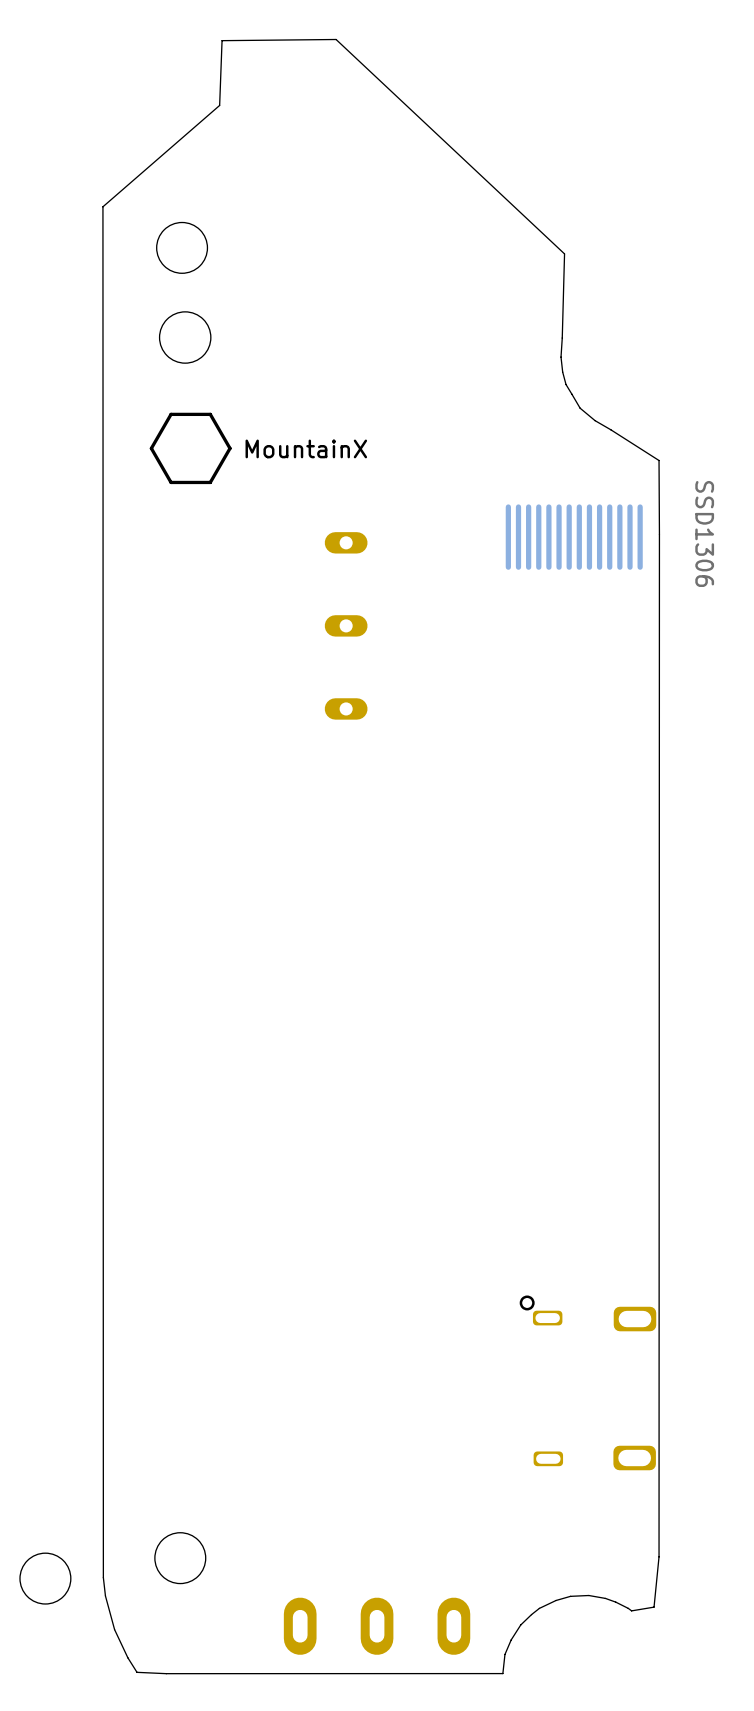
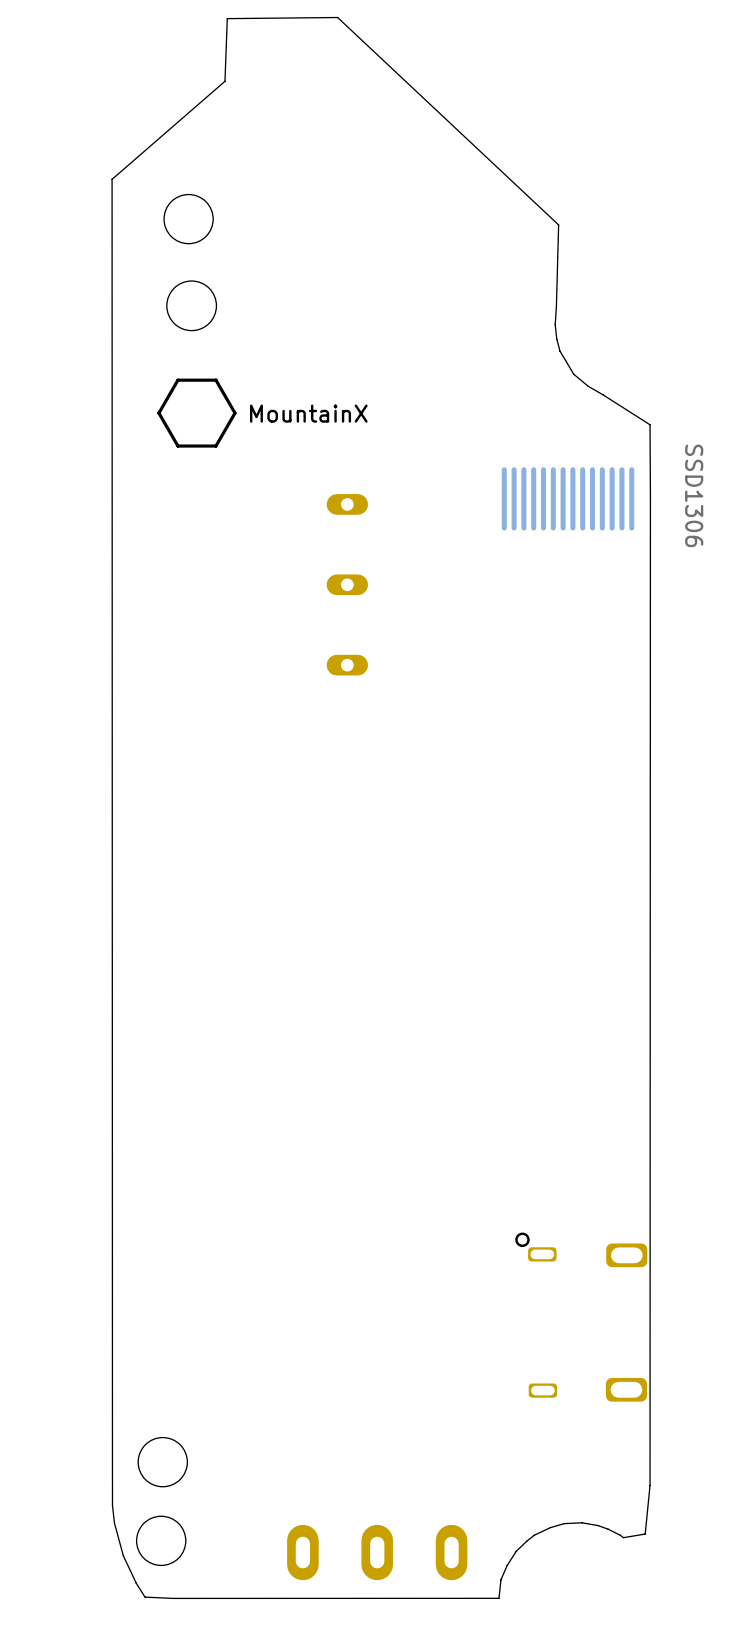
round board edge: none -> [137, 1437, 188, 1488]
round board edge: [154, 1532, 207, 1584] -> none
round board edge: [19, 1552, 72, 1605] -> none
round board edge: none -> [136, 1515, 187, 1566]

